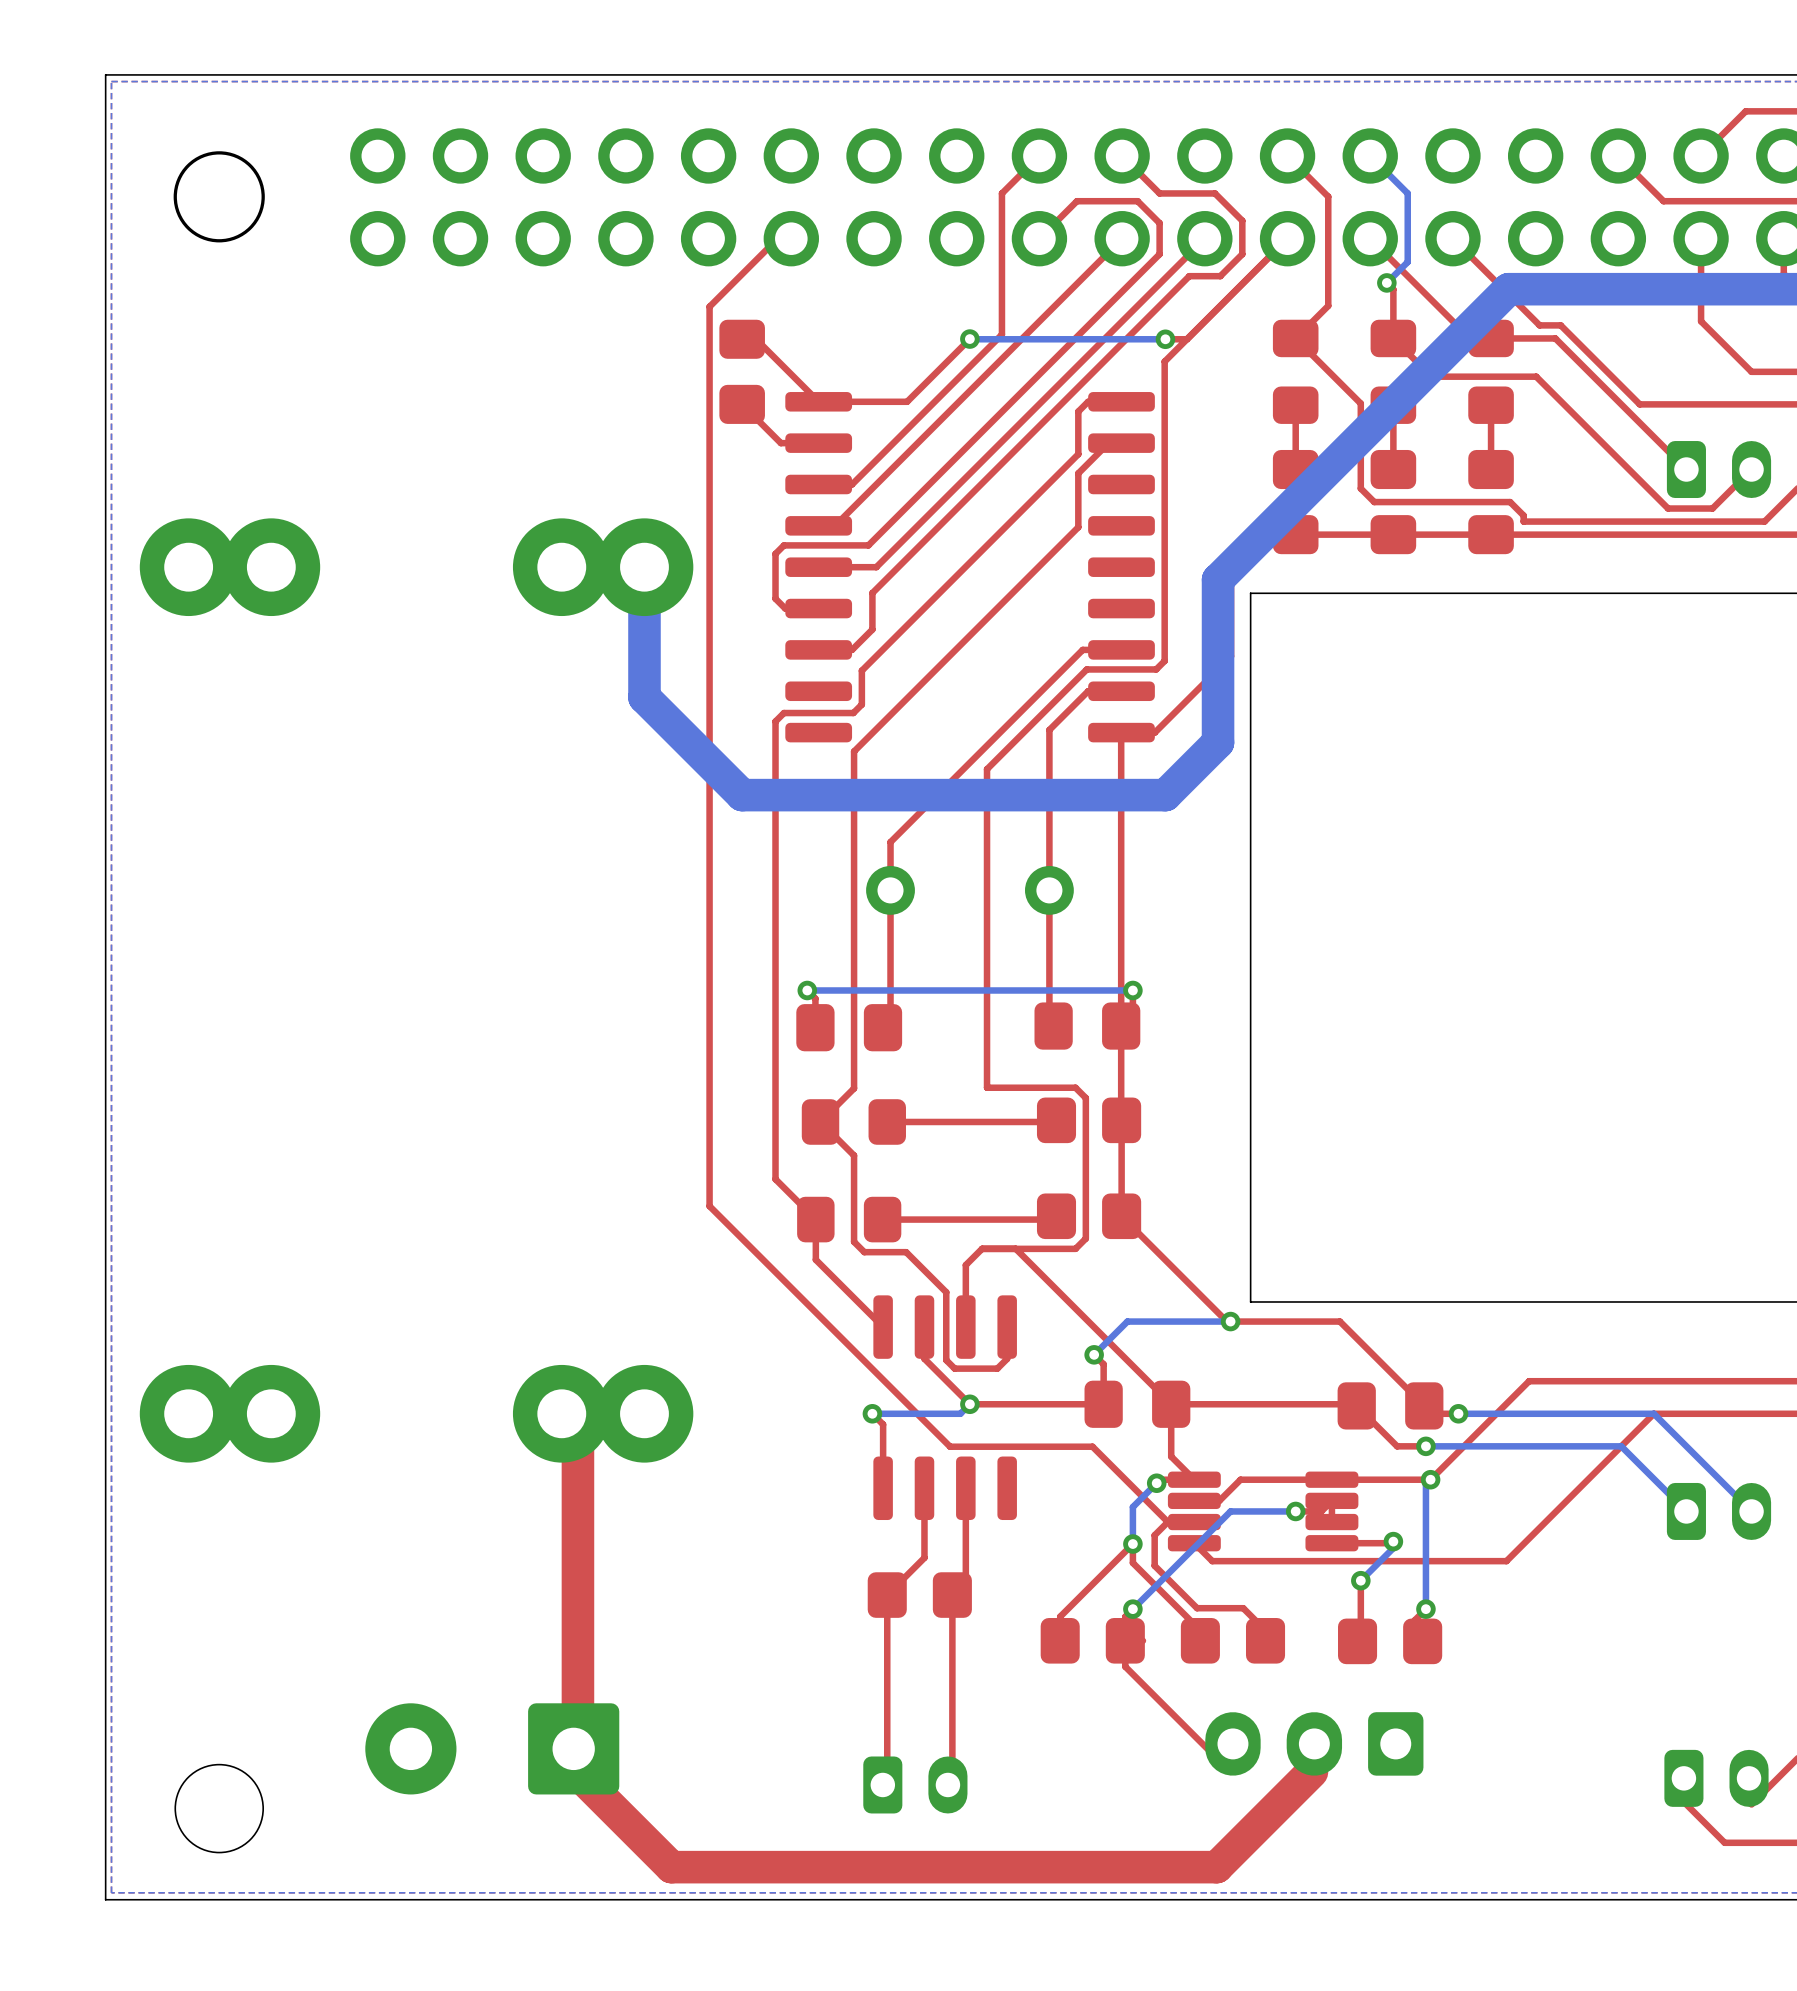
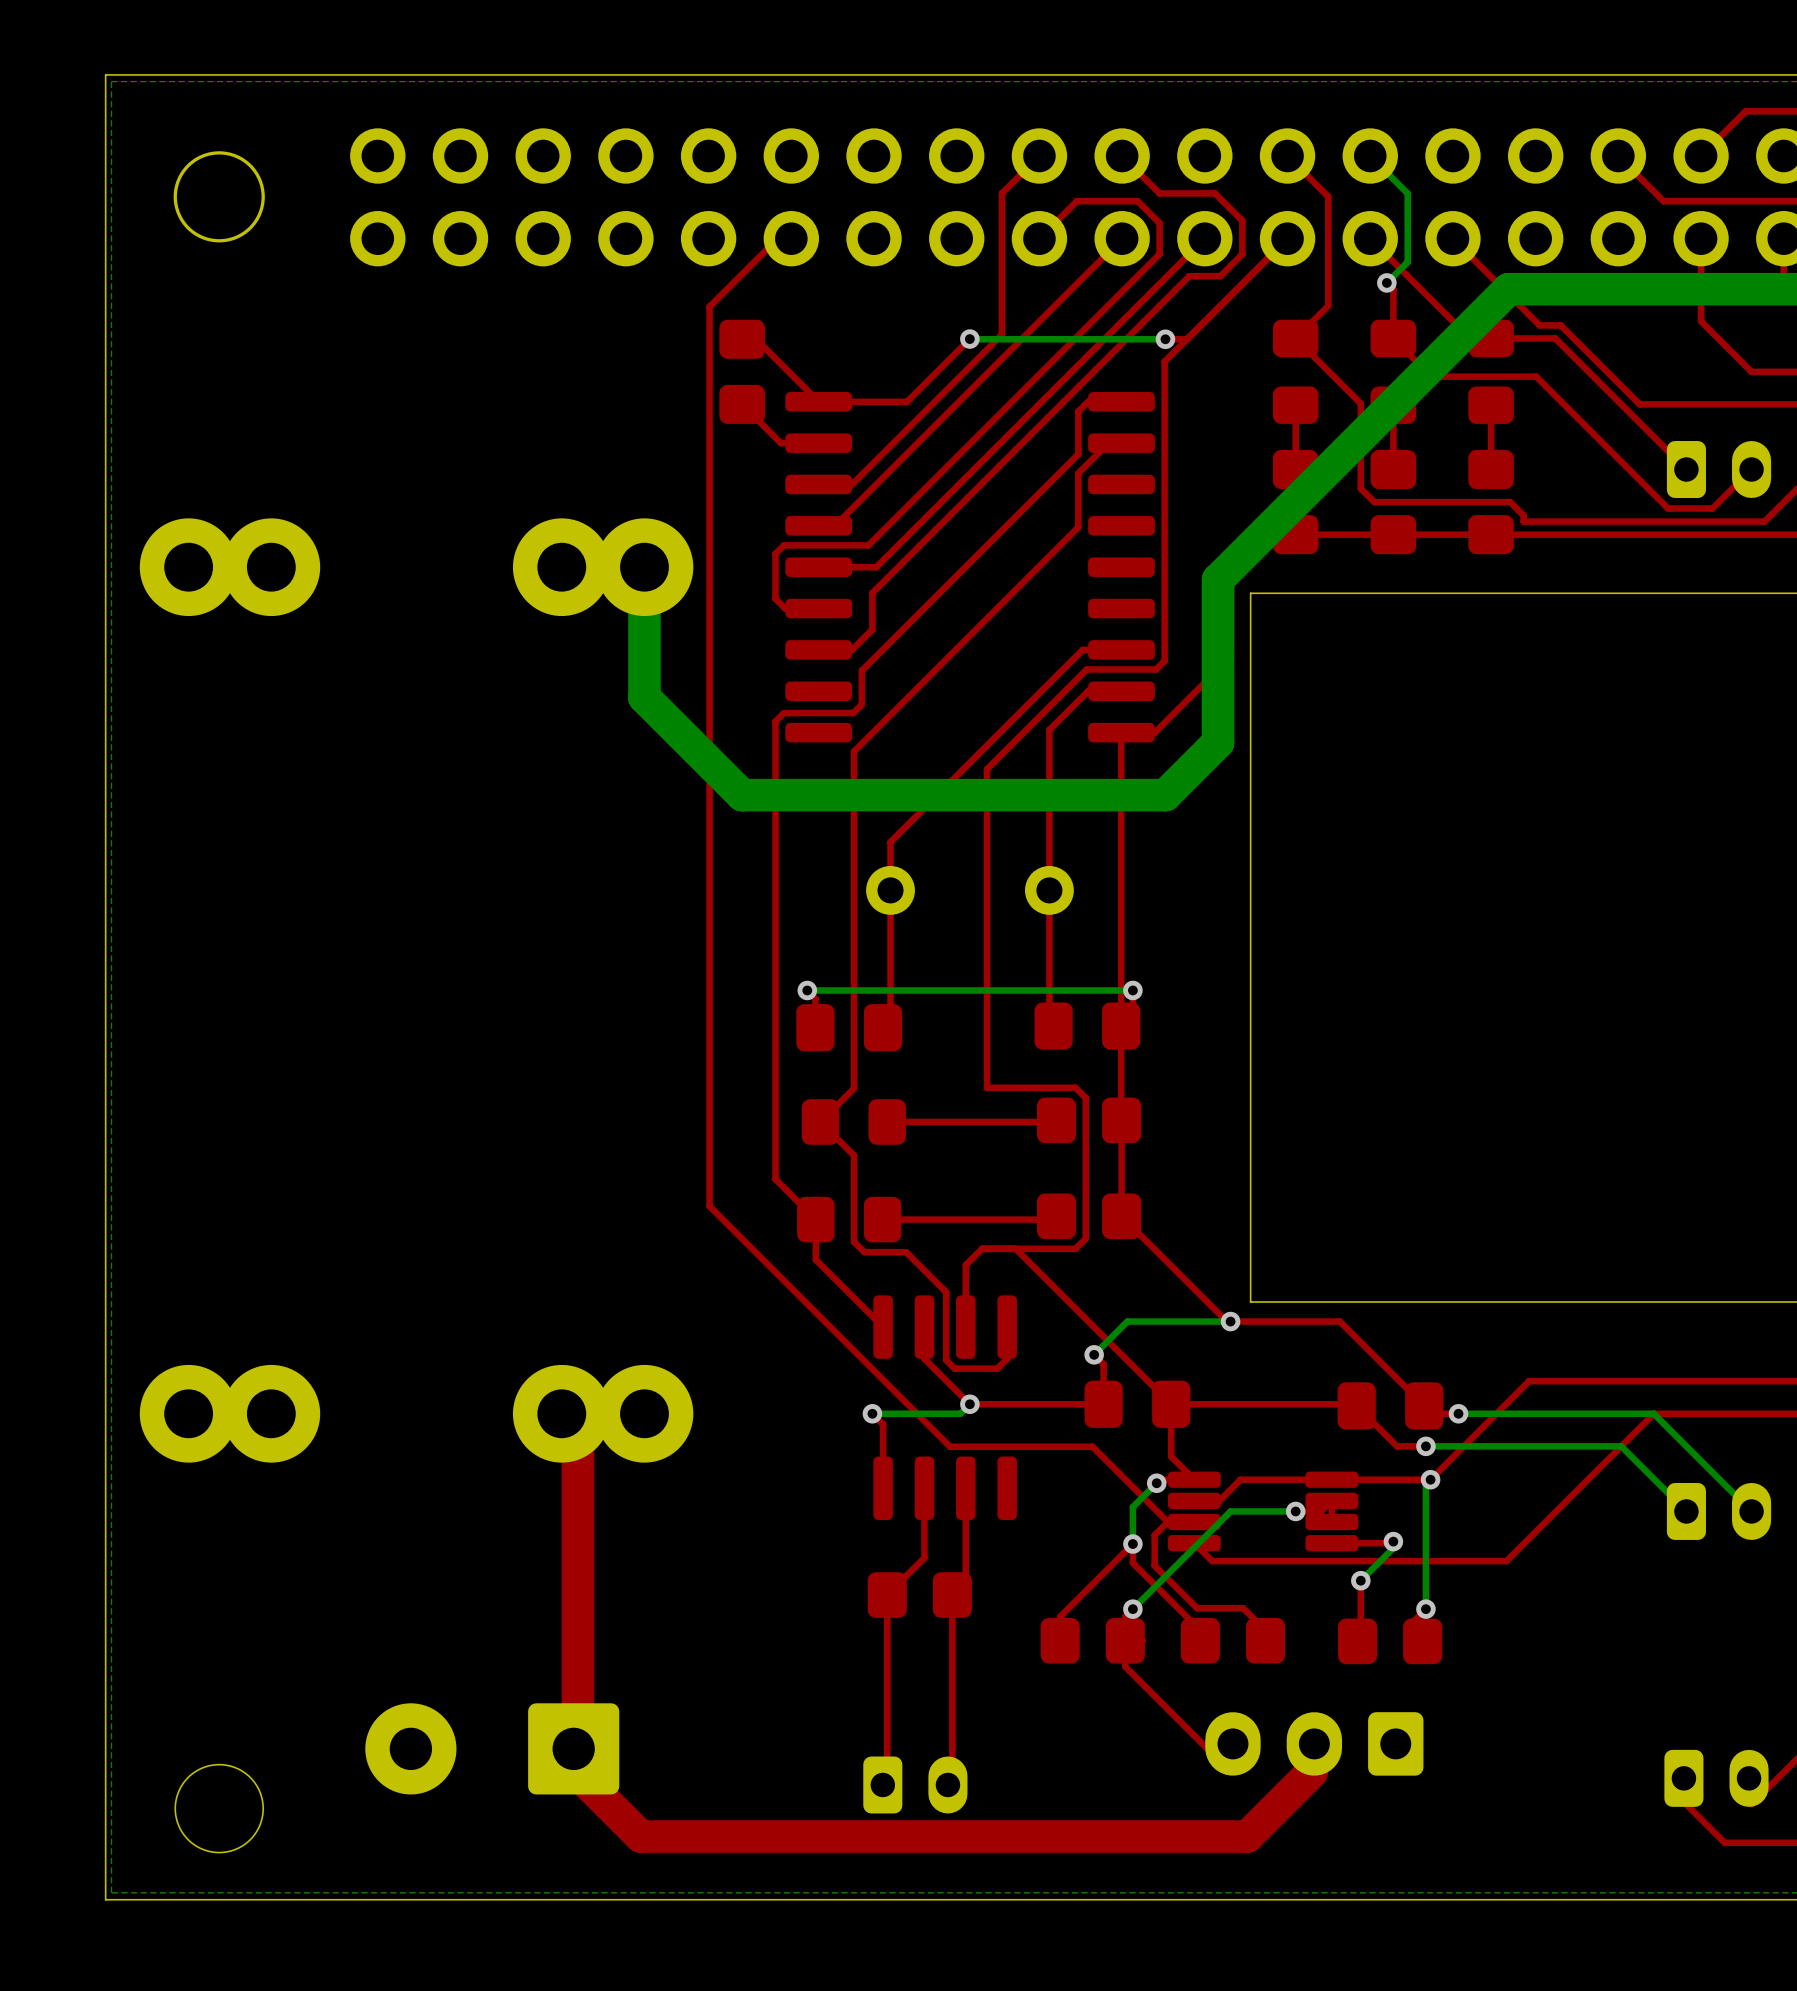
top track: (1247, 1836) (1216, 1867) (671, 1867) (640, 1836) -> (1247, 1836) (640, 1836)

